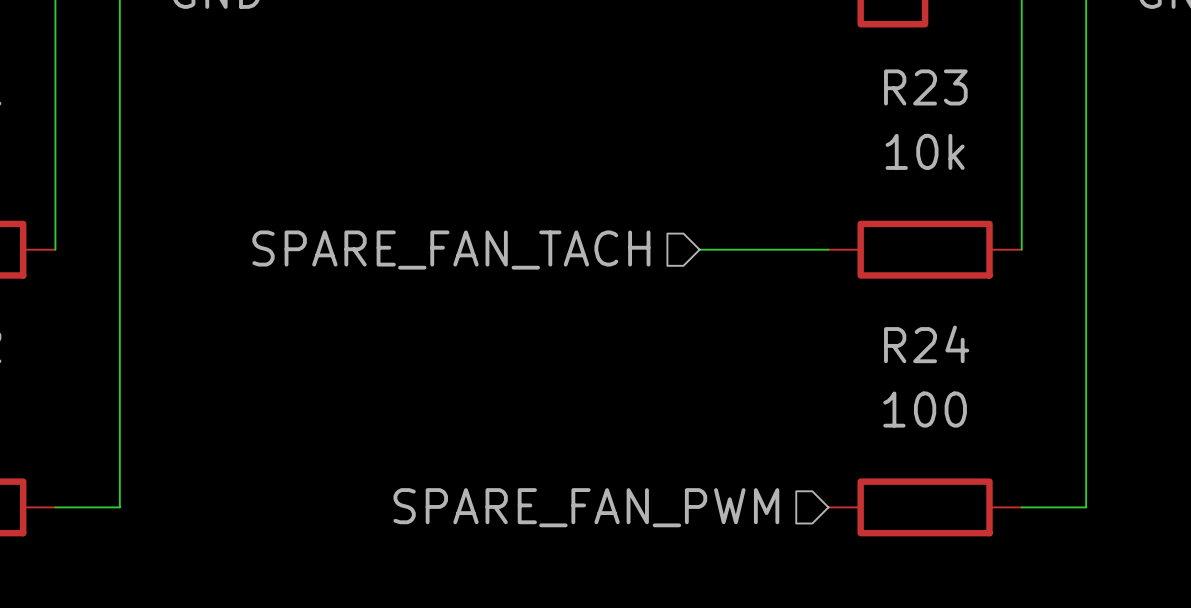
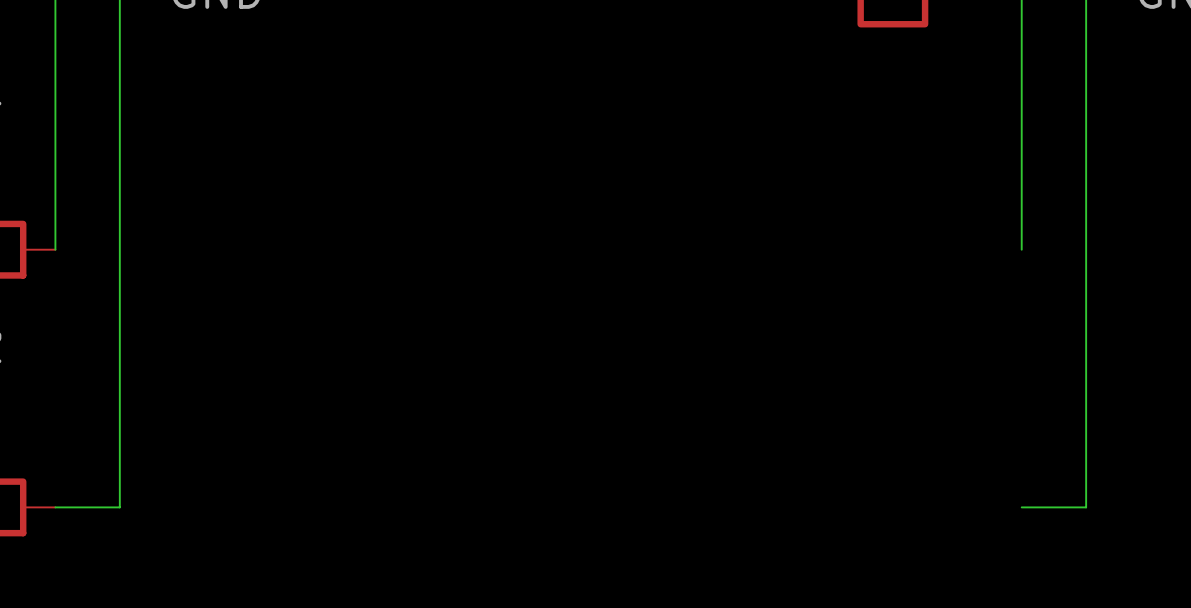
wire: (699, 249) (828, 249) -> none
R23: 10k (925, 249) -> none
hierarchical label: SPARE_FAN_TACH (451, 250) -> none
hierarchical label: SPARE_FAN_PWM (586, 507) -> none
R24: 100 (925, 507) -> none

